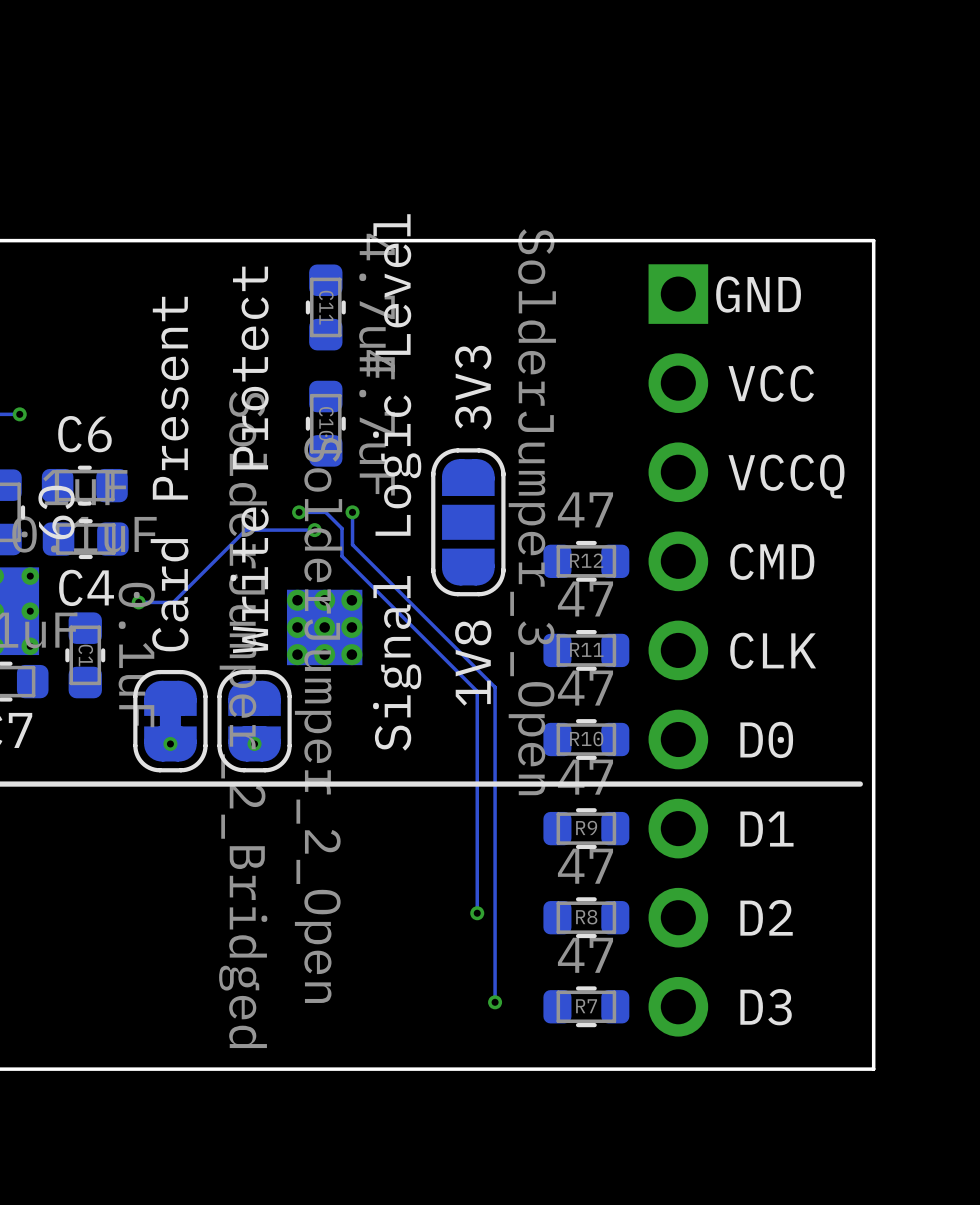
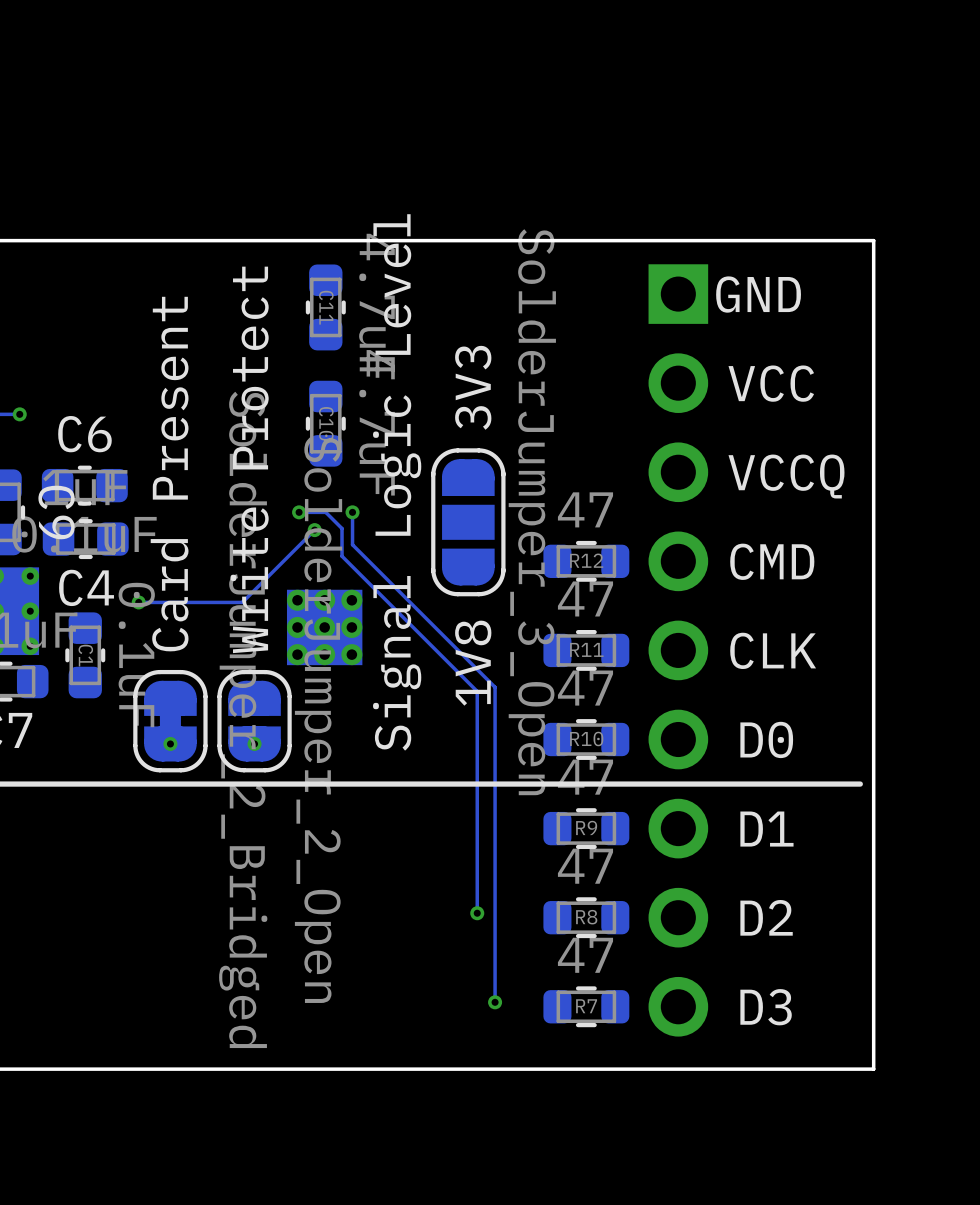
track: (314, 530) (245, 530) (173, 602) -> (314, 530) (242, 602) (173, 602)

